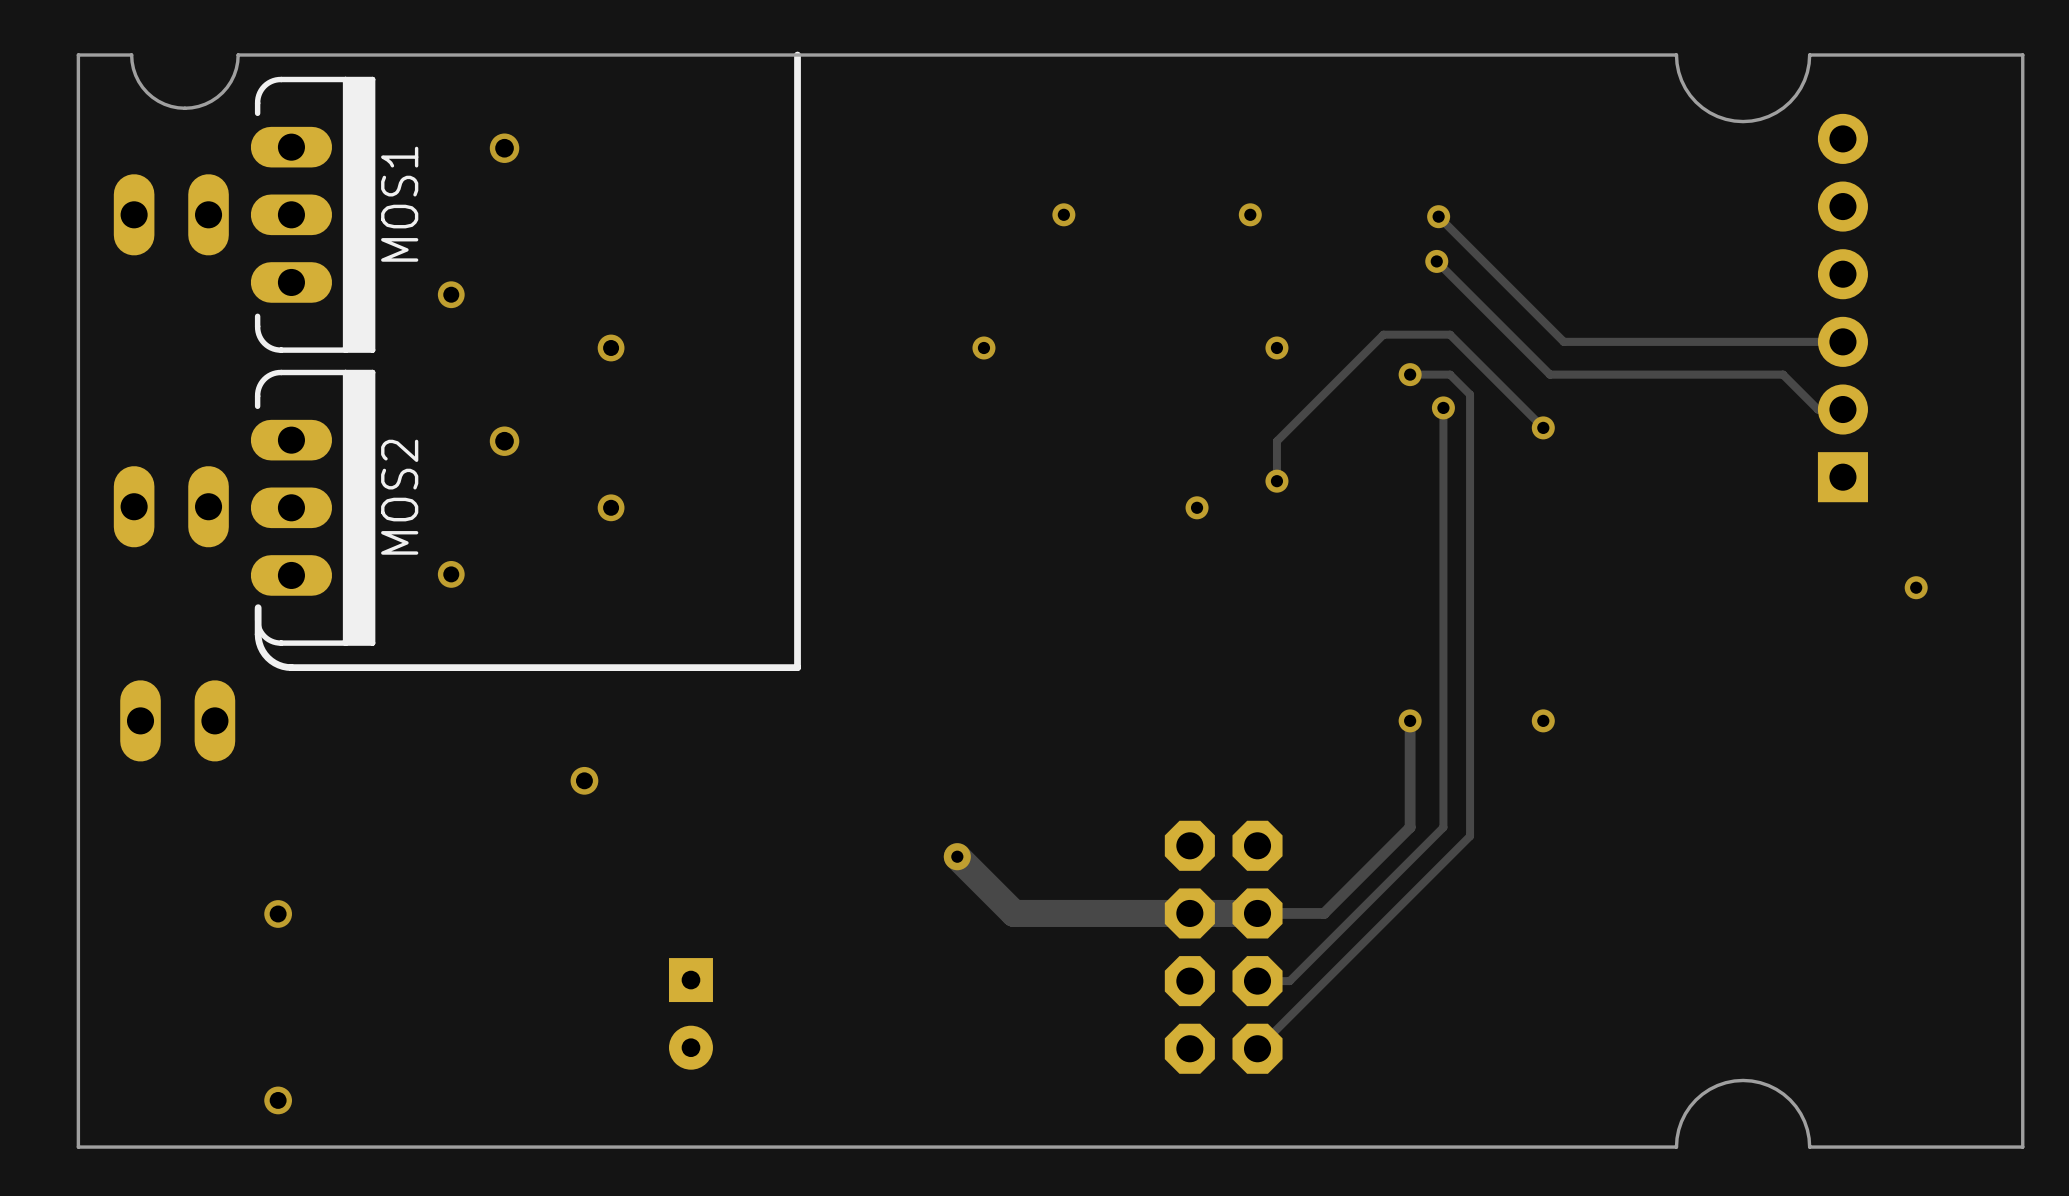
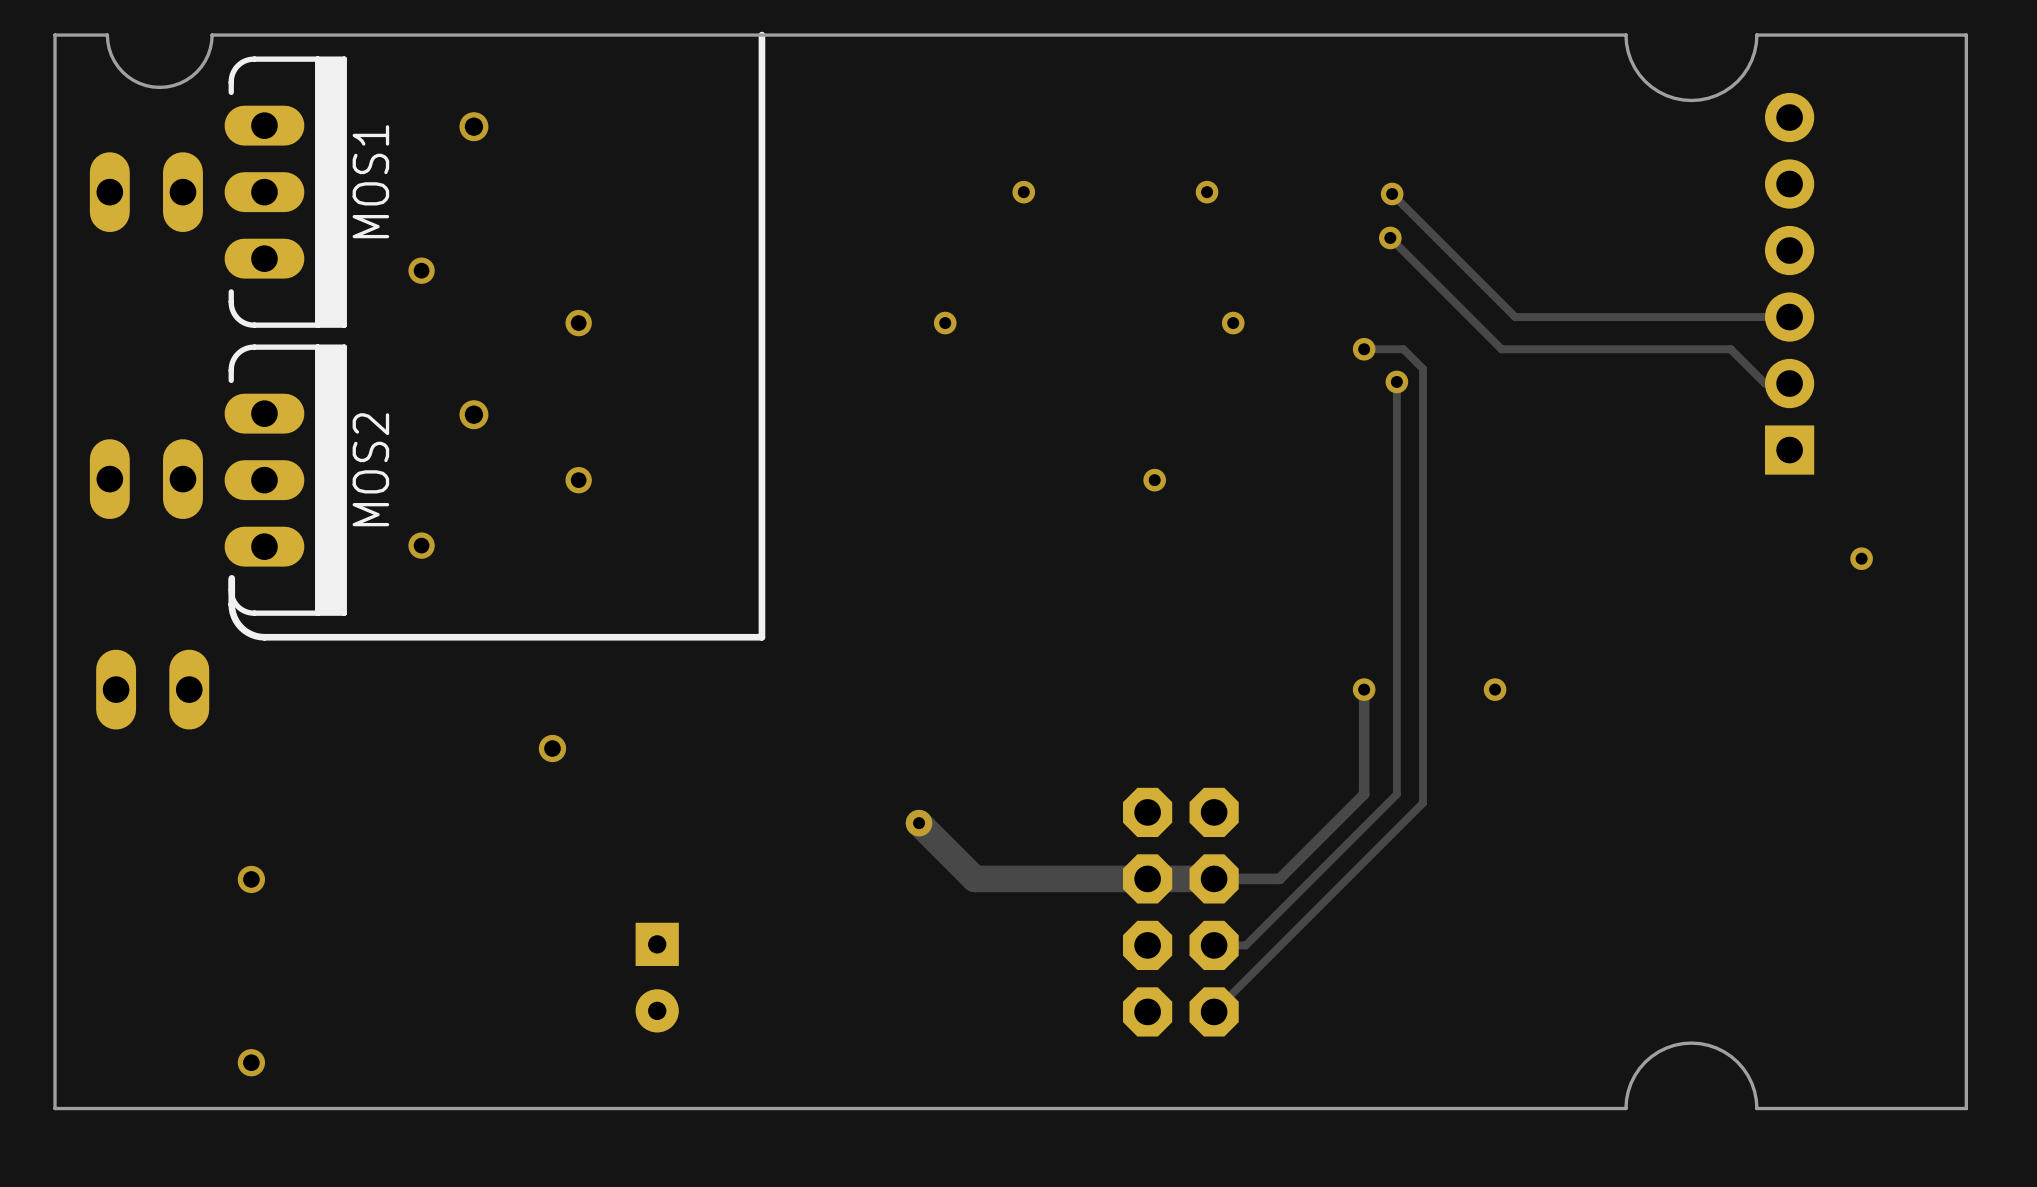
track: (1543, 427) (1450, 334) (1383, 334) (1276, 441) (1276, 481) -> none
via: (1543, 427) -> none
via: (1276, 481) -> none

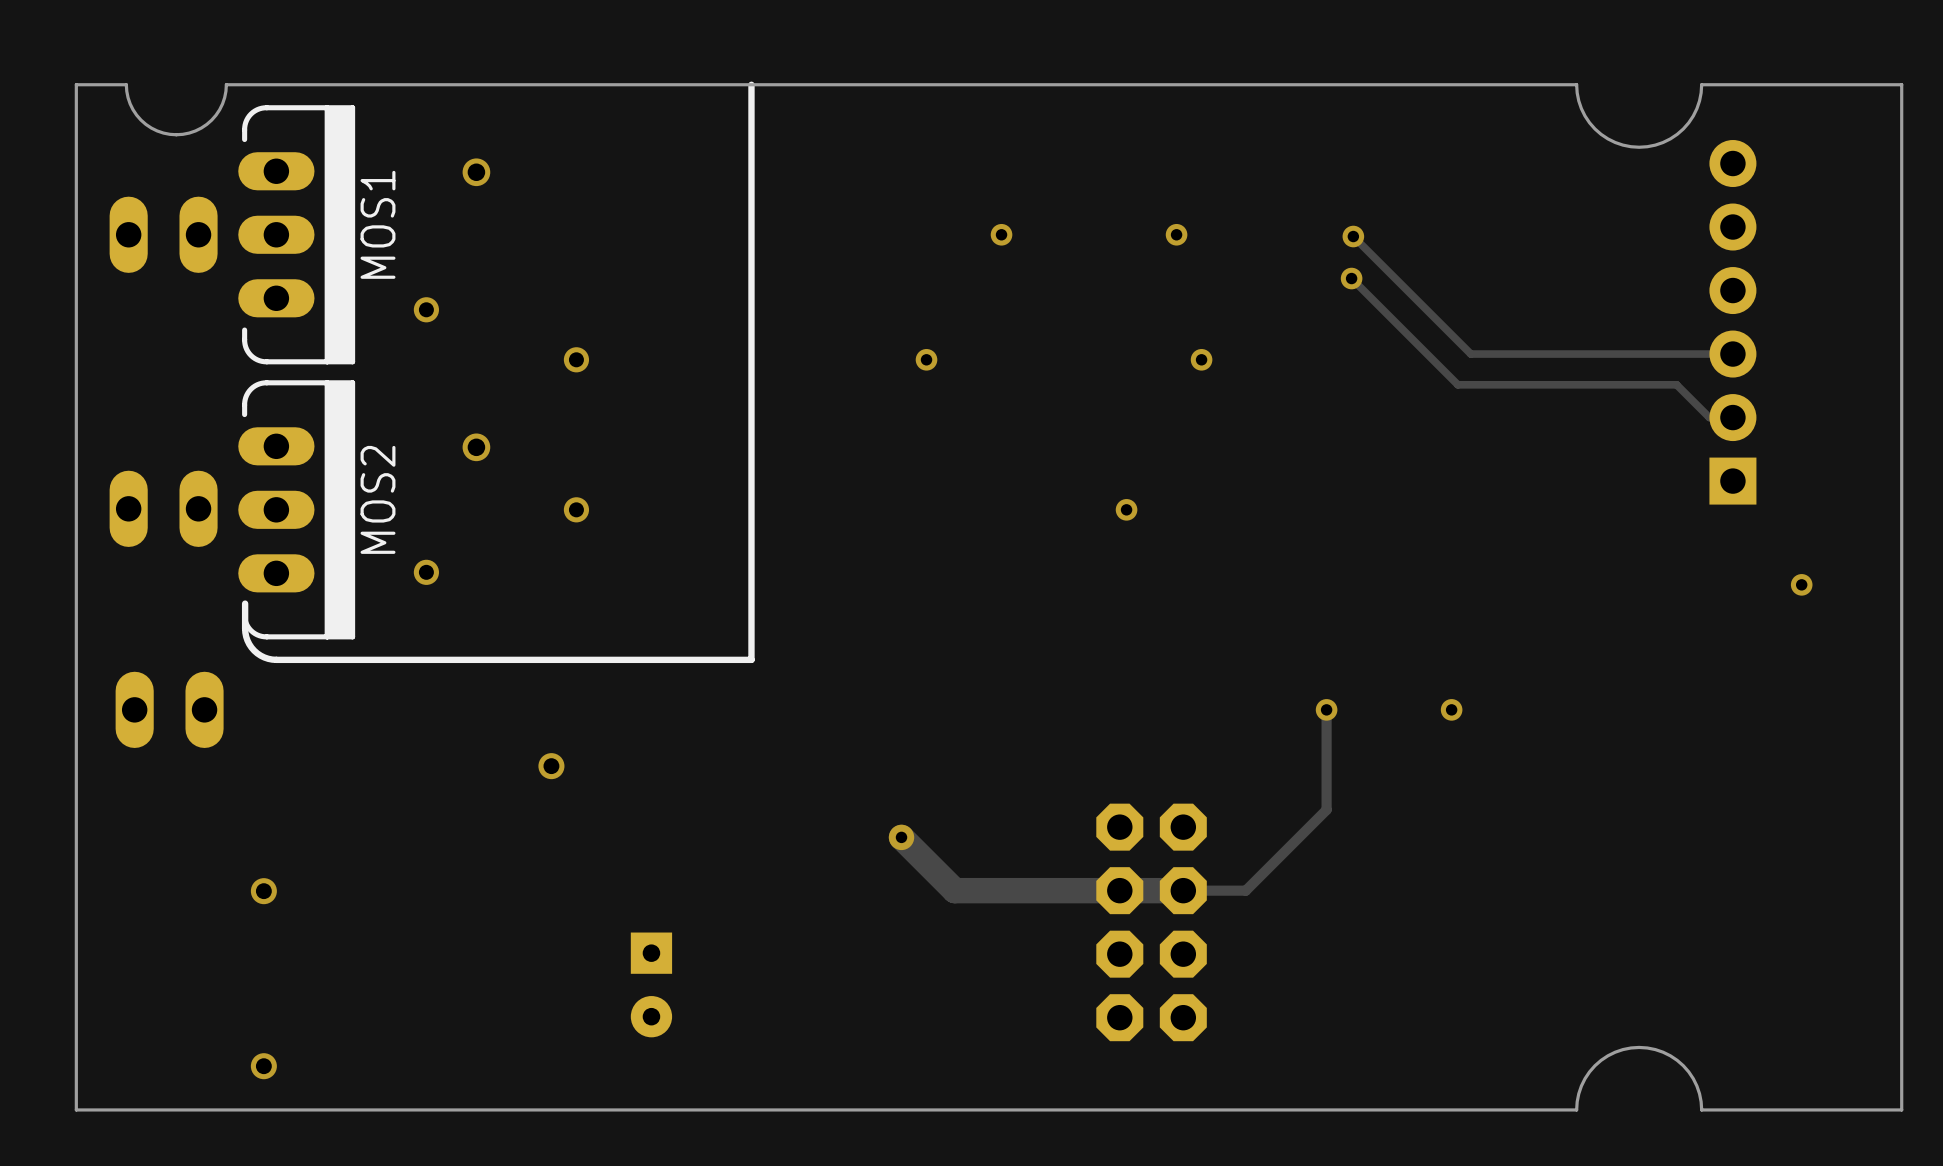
track: (1364, 349) (1403, 349) (1423, 368) (1423, 802) (1214, 1011) -> none
via: (1364, 349) -> none
track: (1396, 381) (1396, 794) (1245, 945) (1214, 945) -> none
via: (1396, 381) -> none

